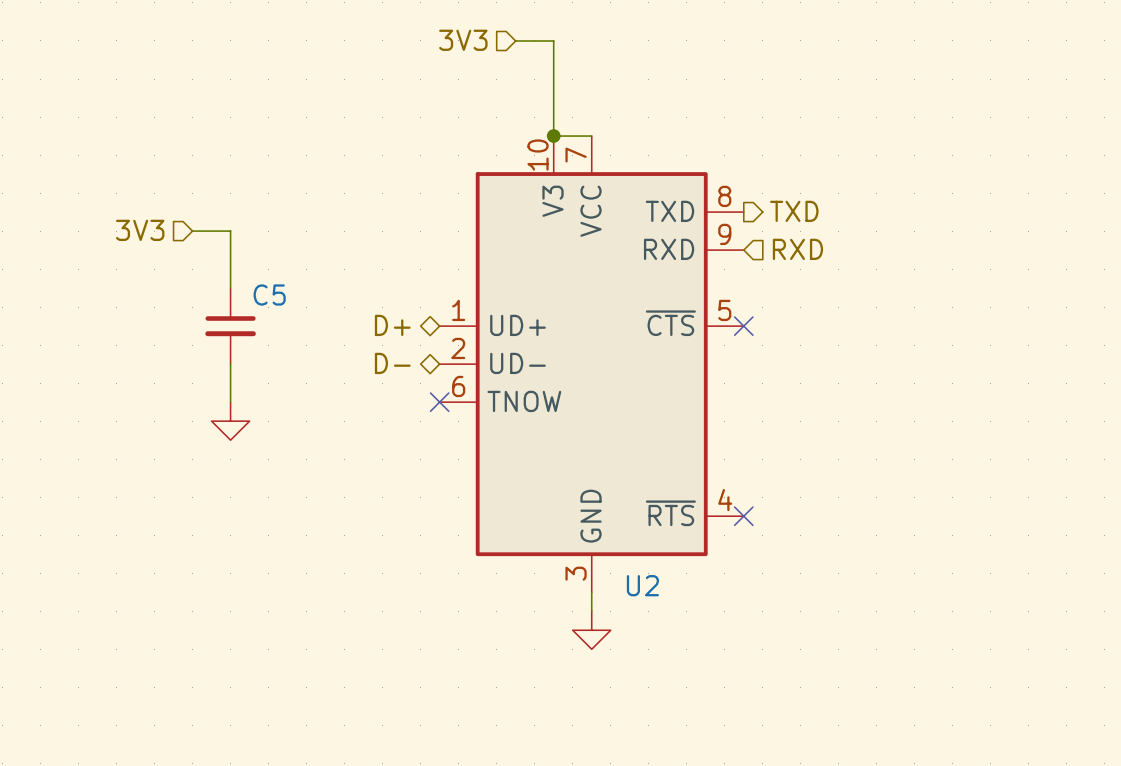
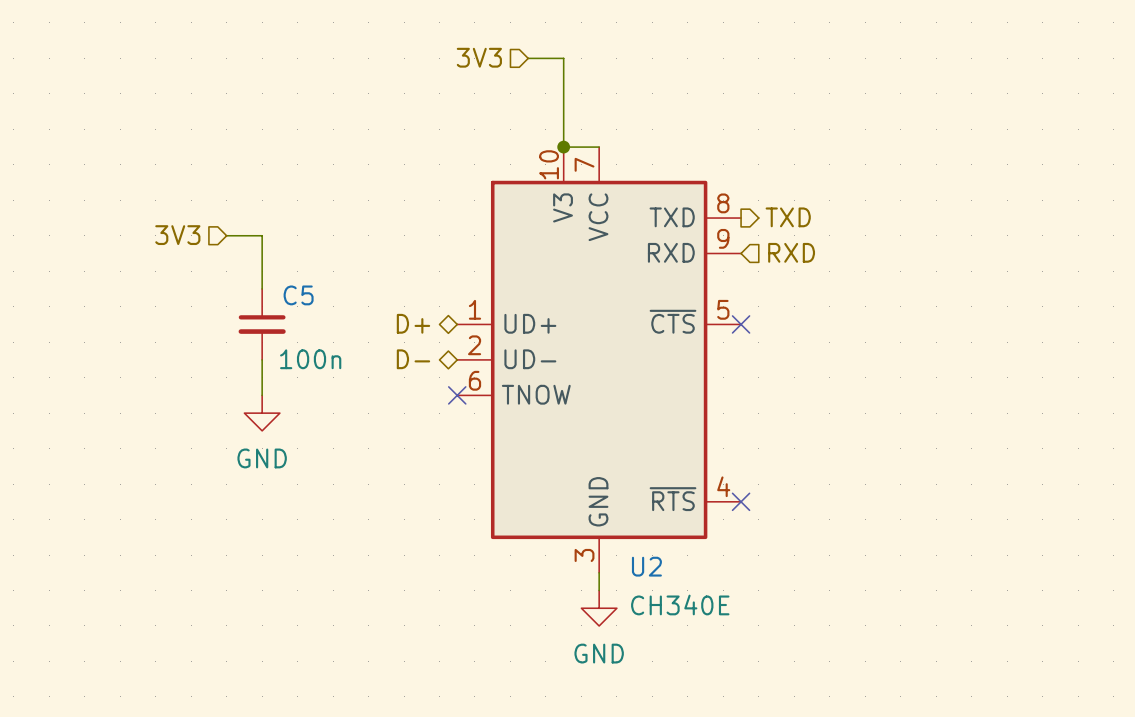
C5 value: none -> 100n (310, 359)
power symbol text: none -> GND (262, 458)
U2 value: none -> CH340E (680, 604)
power symbol text: none -> GND (599, 653)

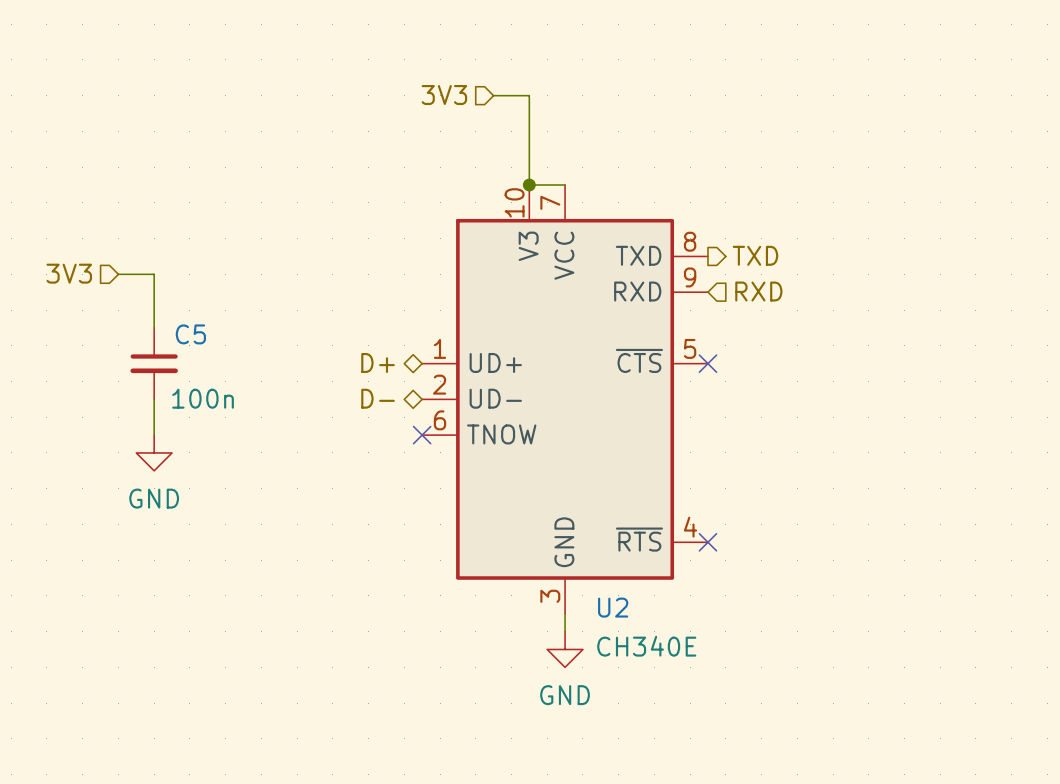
hierarchical label position: 3V3 (177, 235) -> 3V3 (69, 273)
wire: (226, 235) (262, 235) (262, 288) -> (118, 274) (154, 274) (154, 327)
C5 position: (262, 324) -> (154, 363)
wire: (262, 359) (262, 395) -> (154, 399) (154, 435)
power symbol position: GND (262, 413) -> GND (154, 452)

